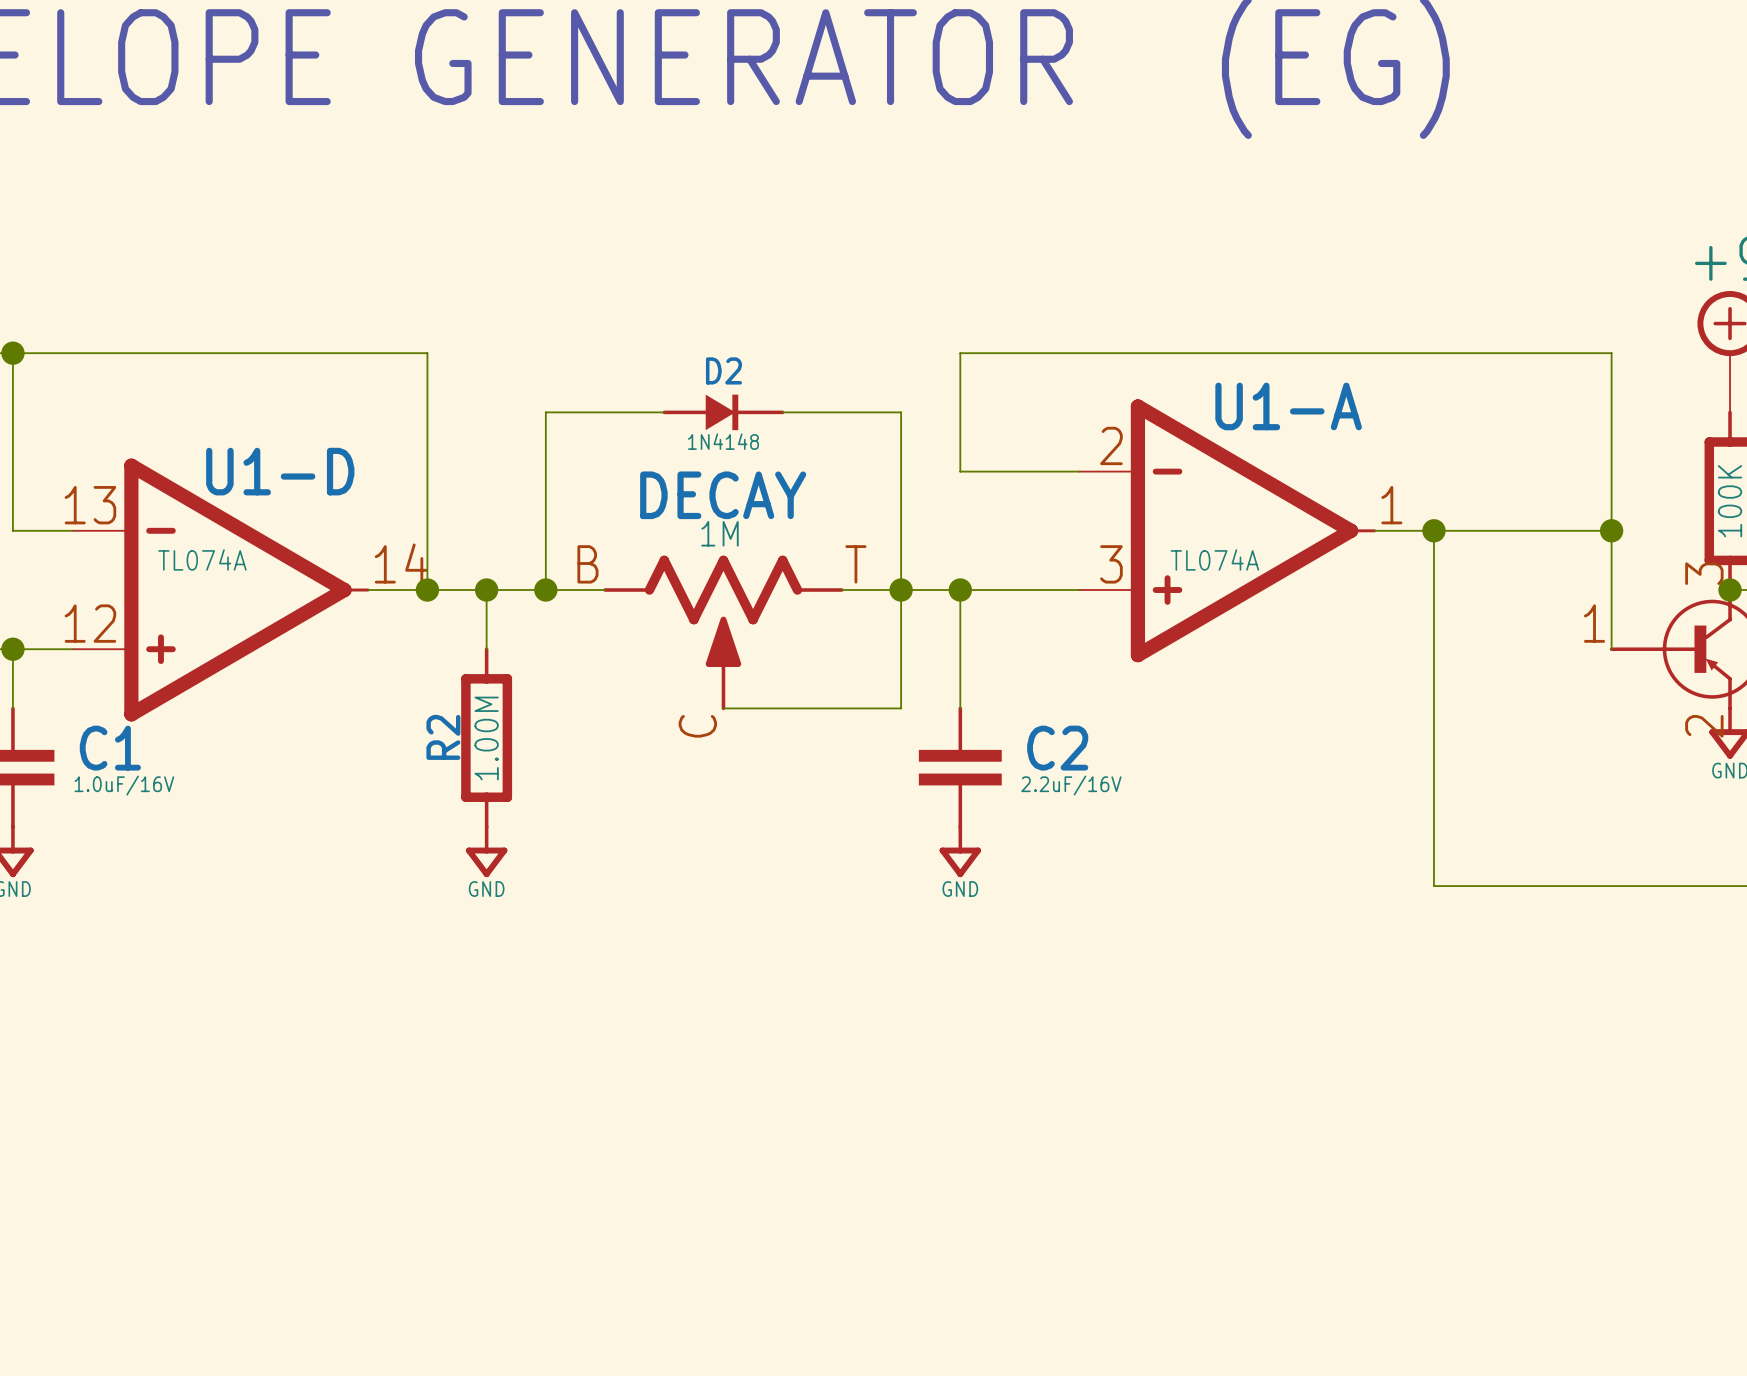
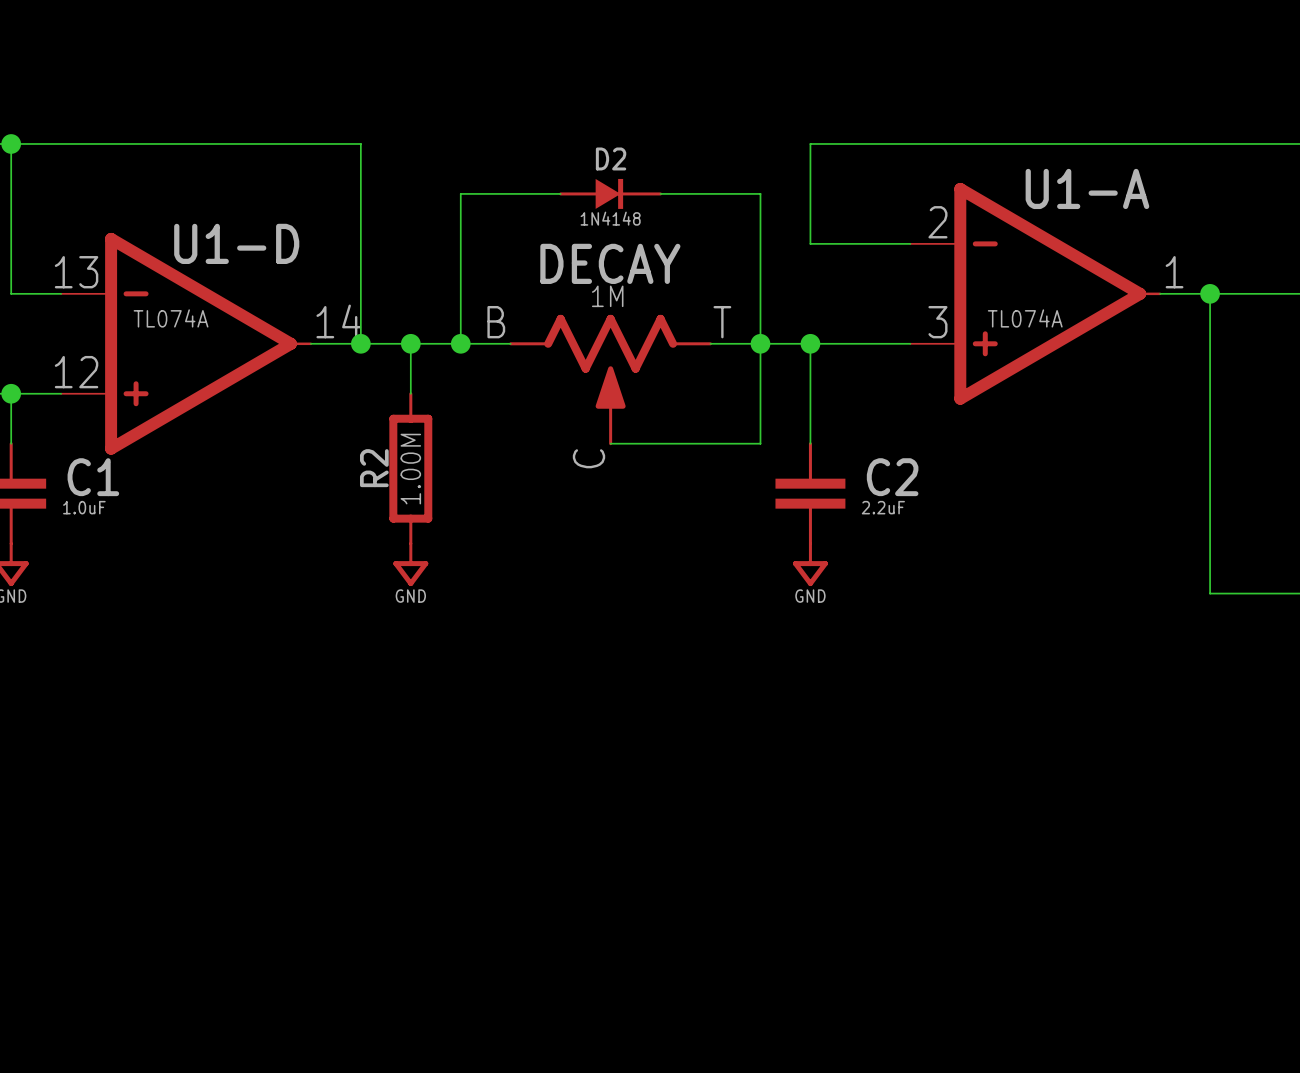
C1 value: 1.0uF/16V (124, 785) -> 1.0uF (84, 507)
C2 value: 2.2uF/16V (1071, 785) -> 2.2uF (883, 507)

